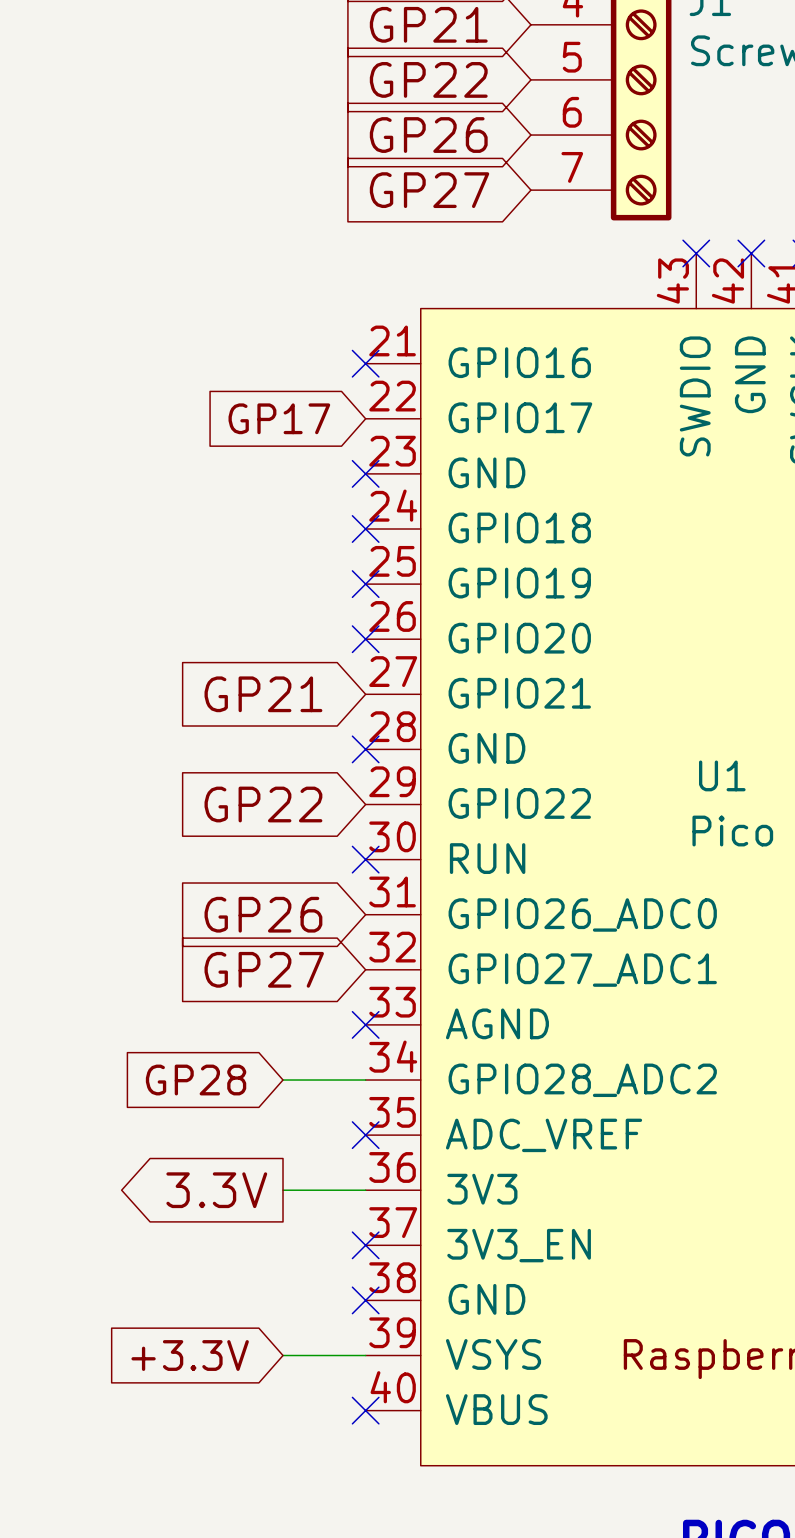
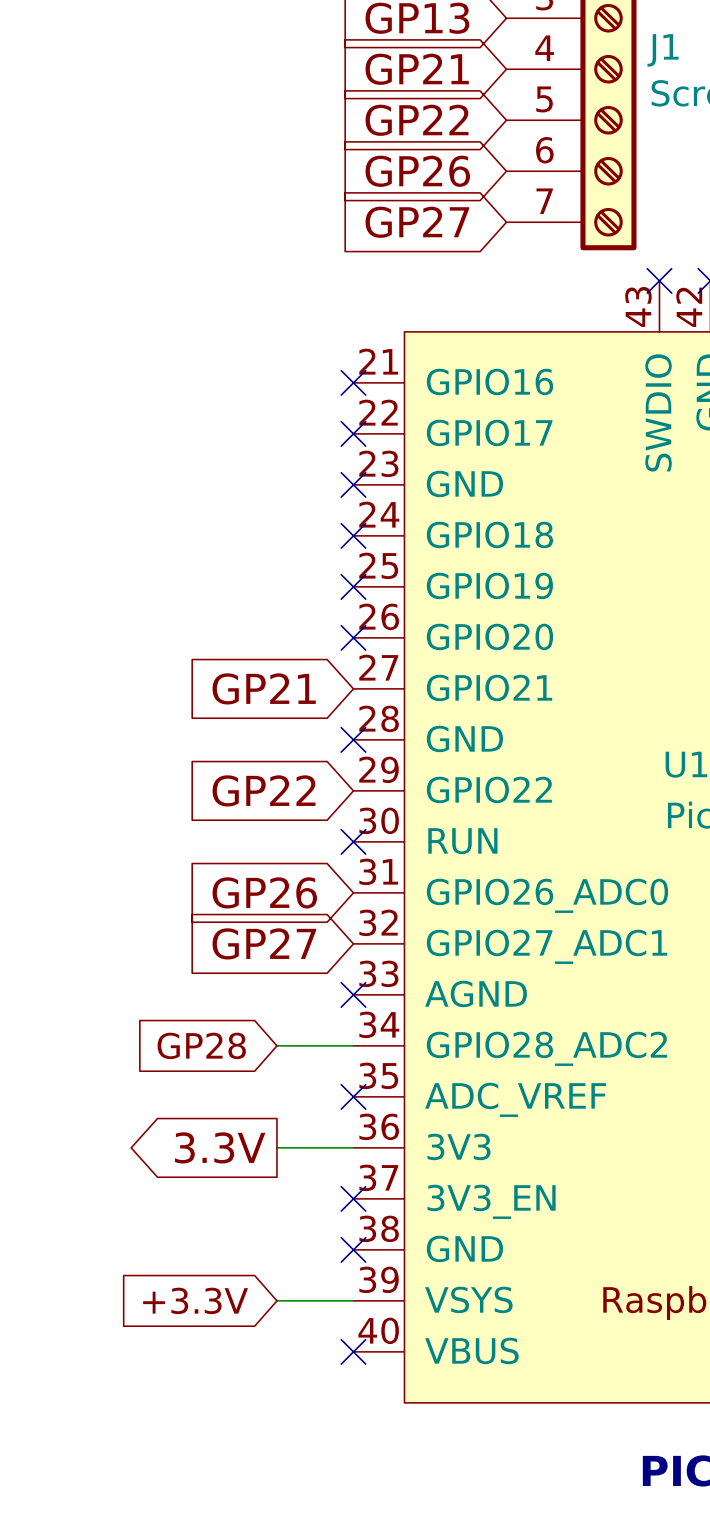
global label: GP17 (279, 418) -> none
no-connect mark: none -> (353, 433)

